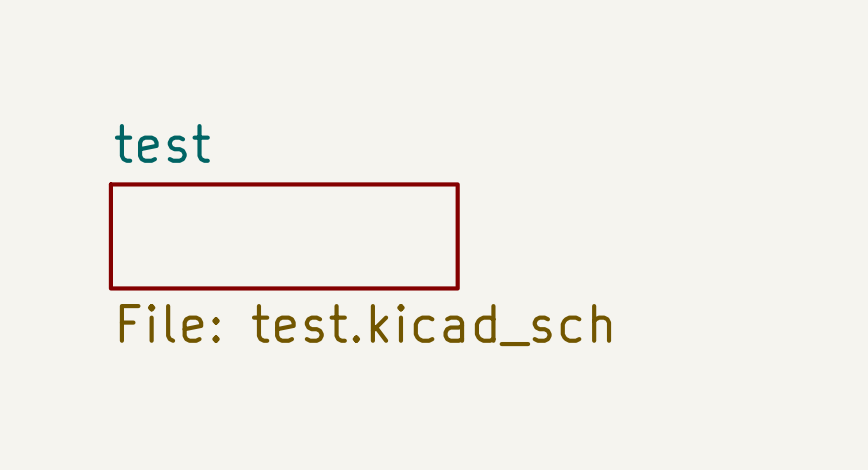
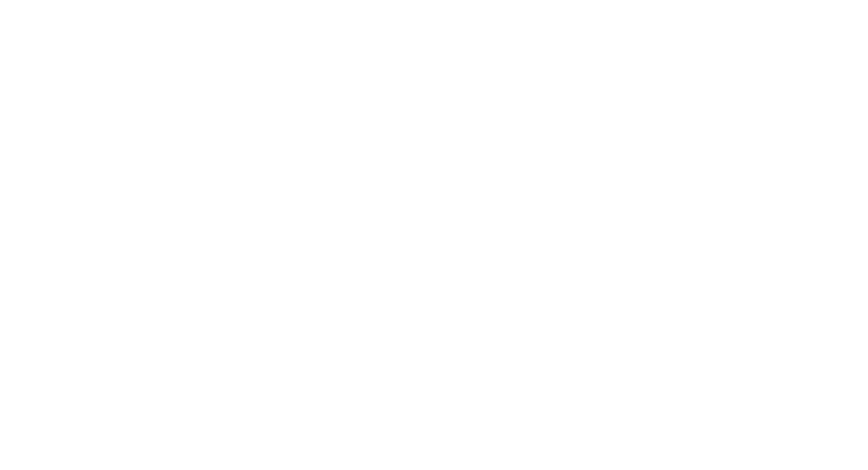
sheet test: File: test.kicad_sch (284, 236) -> none

